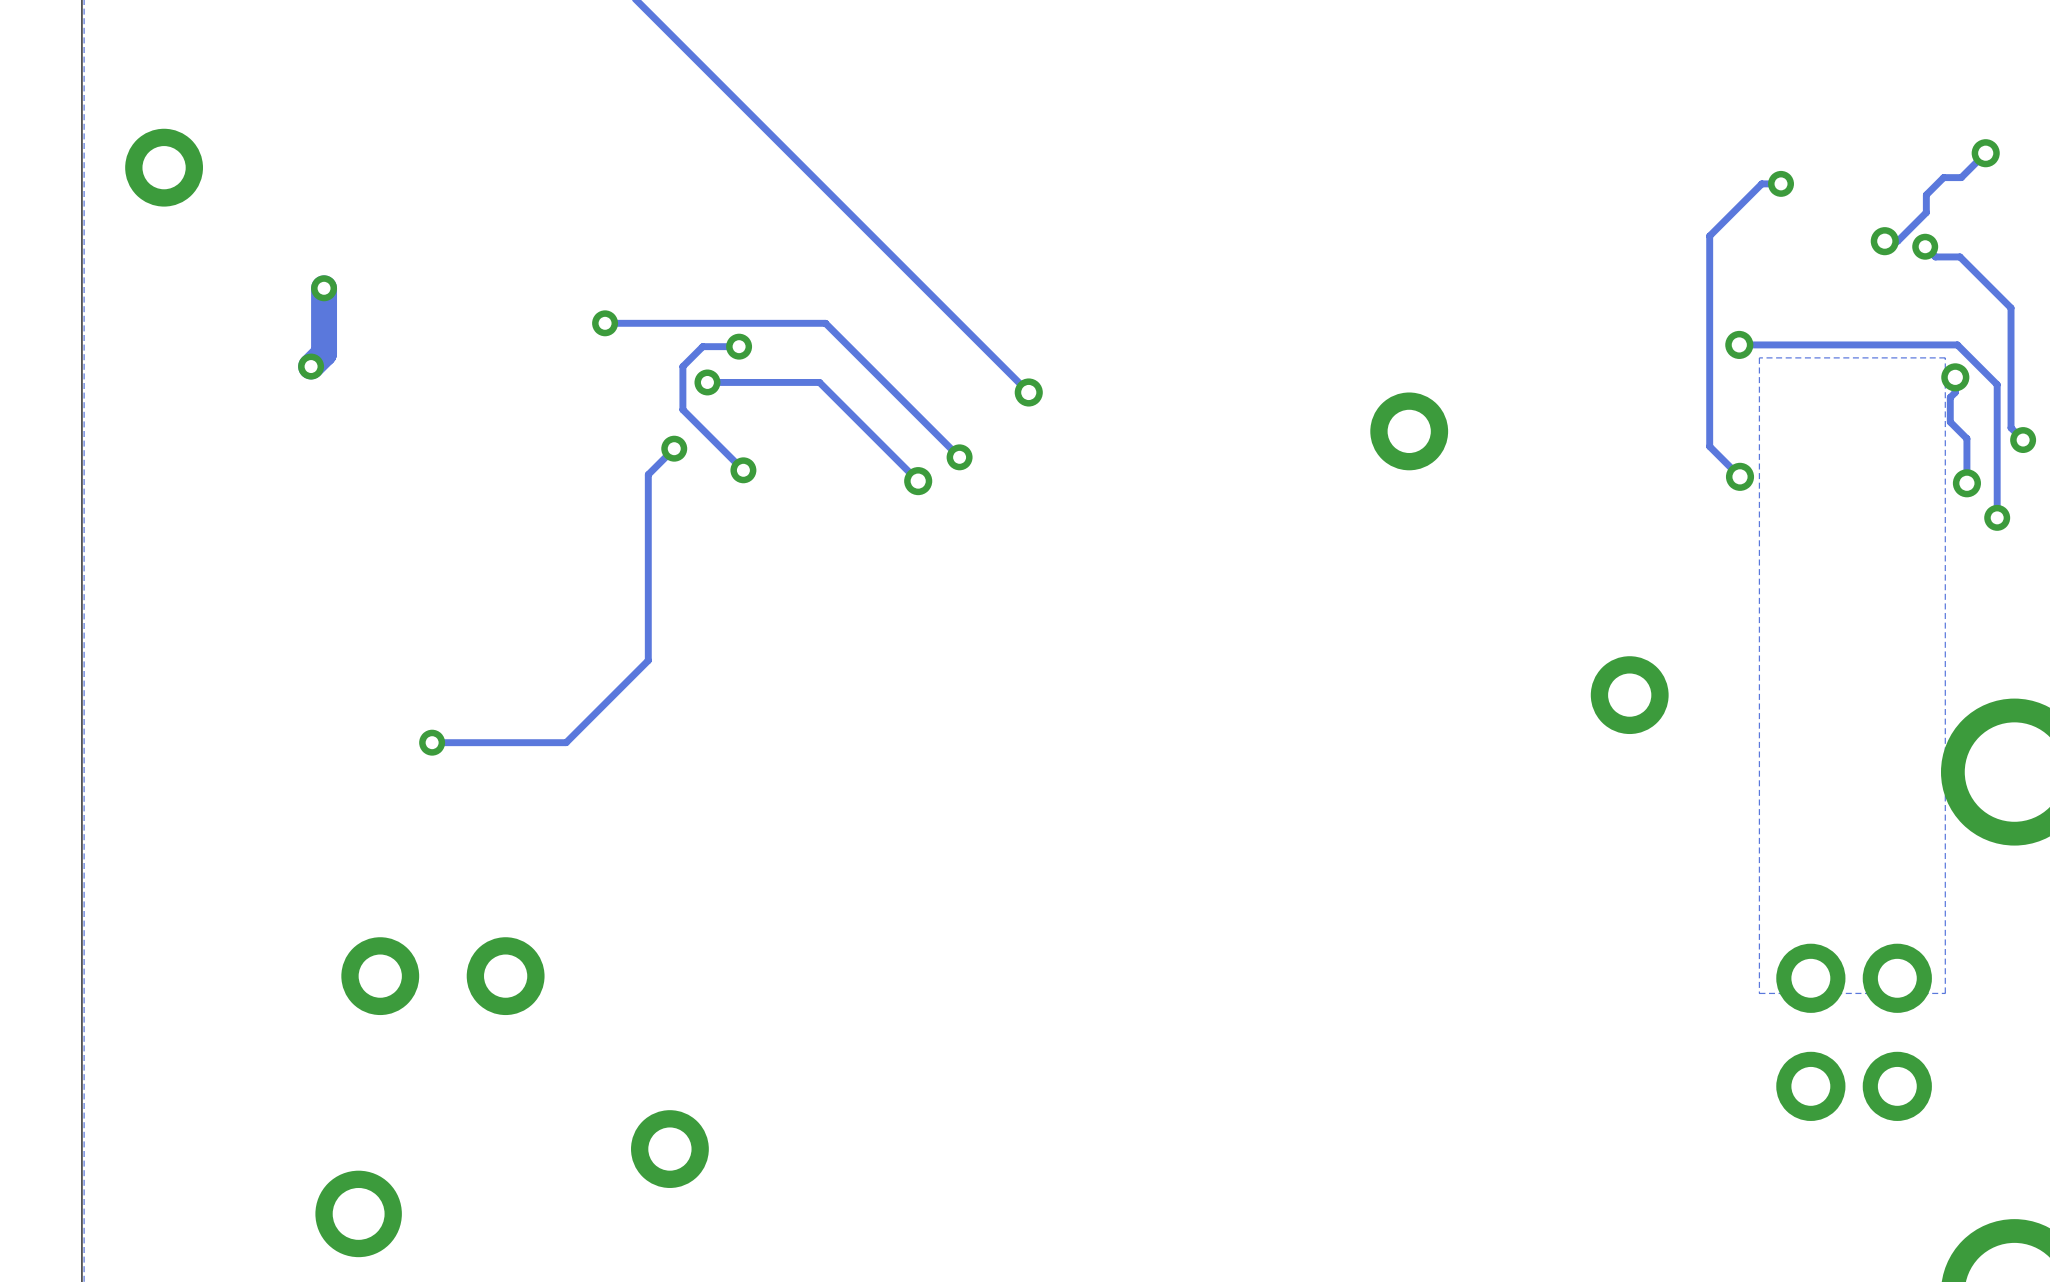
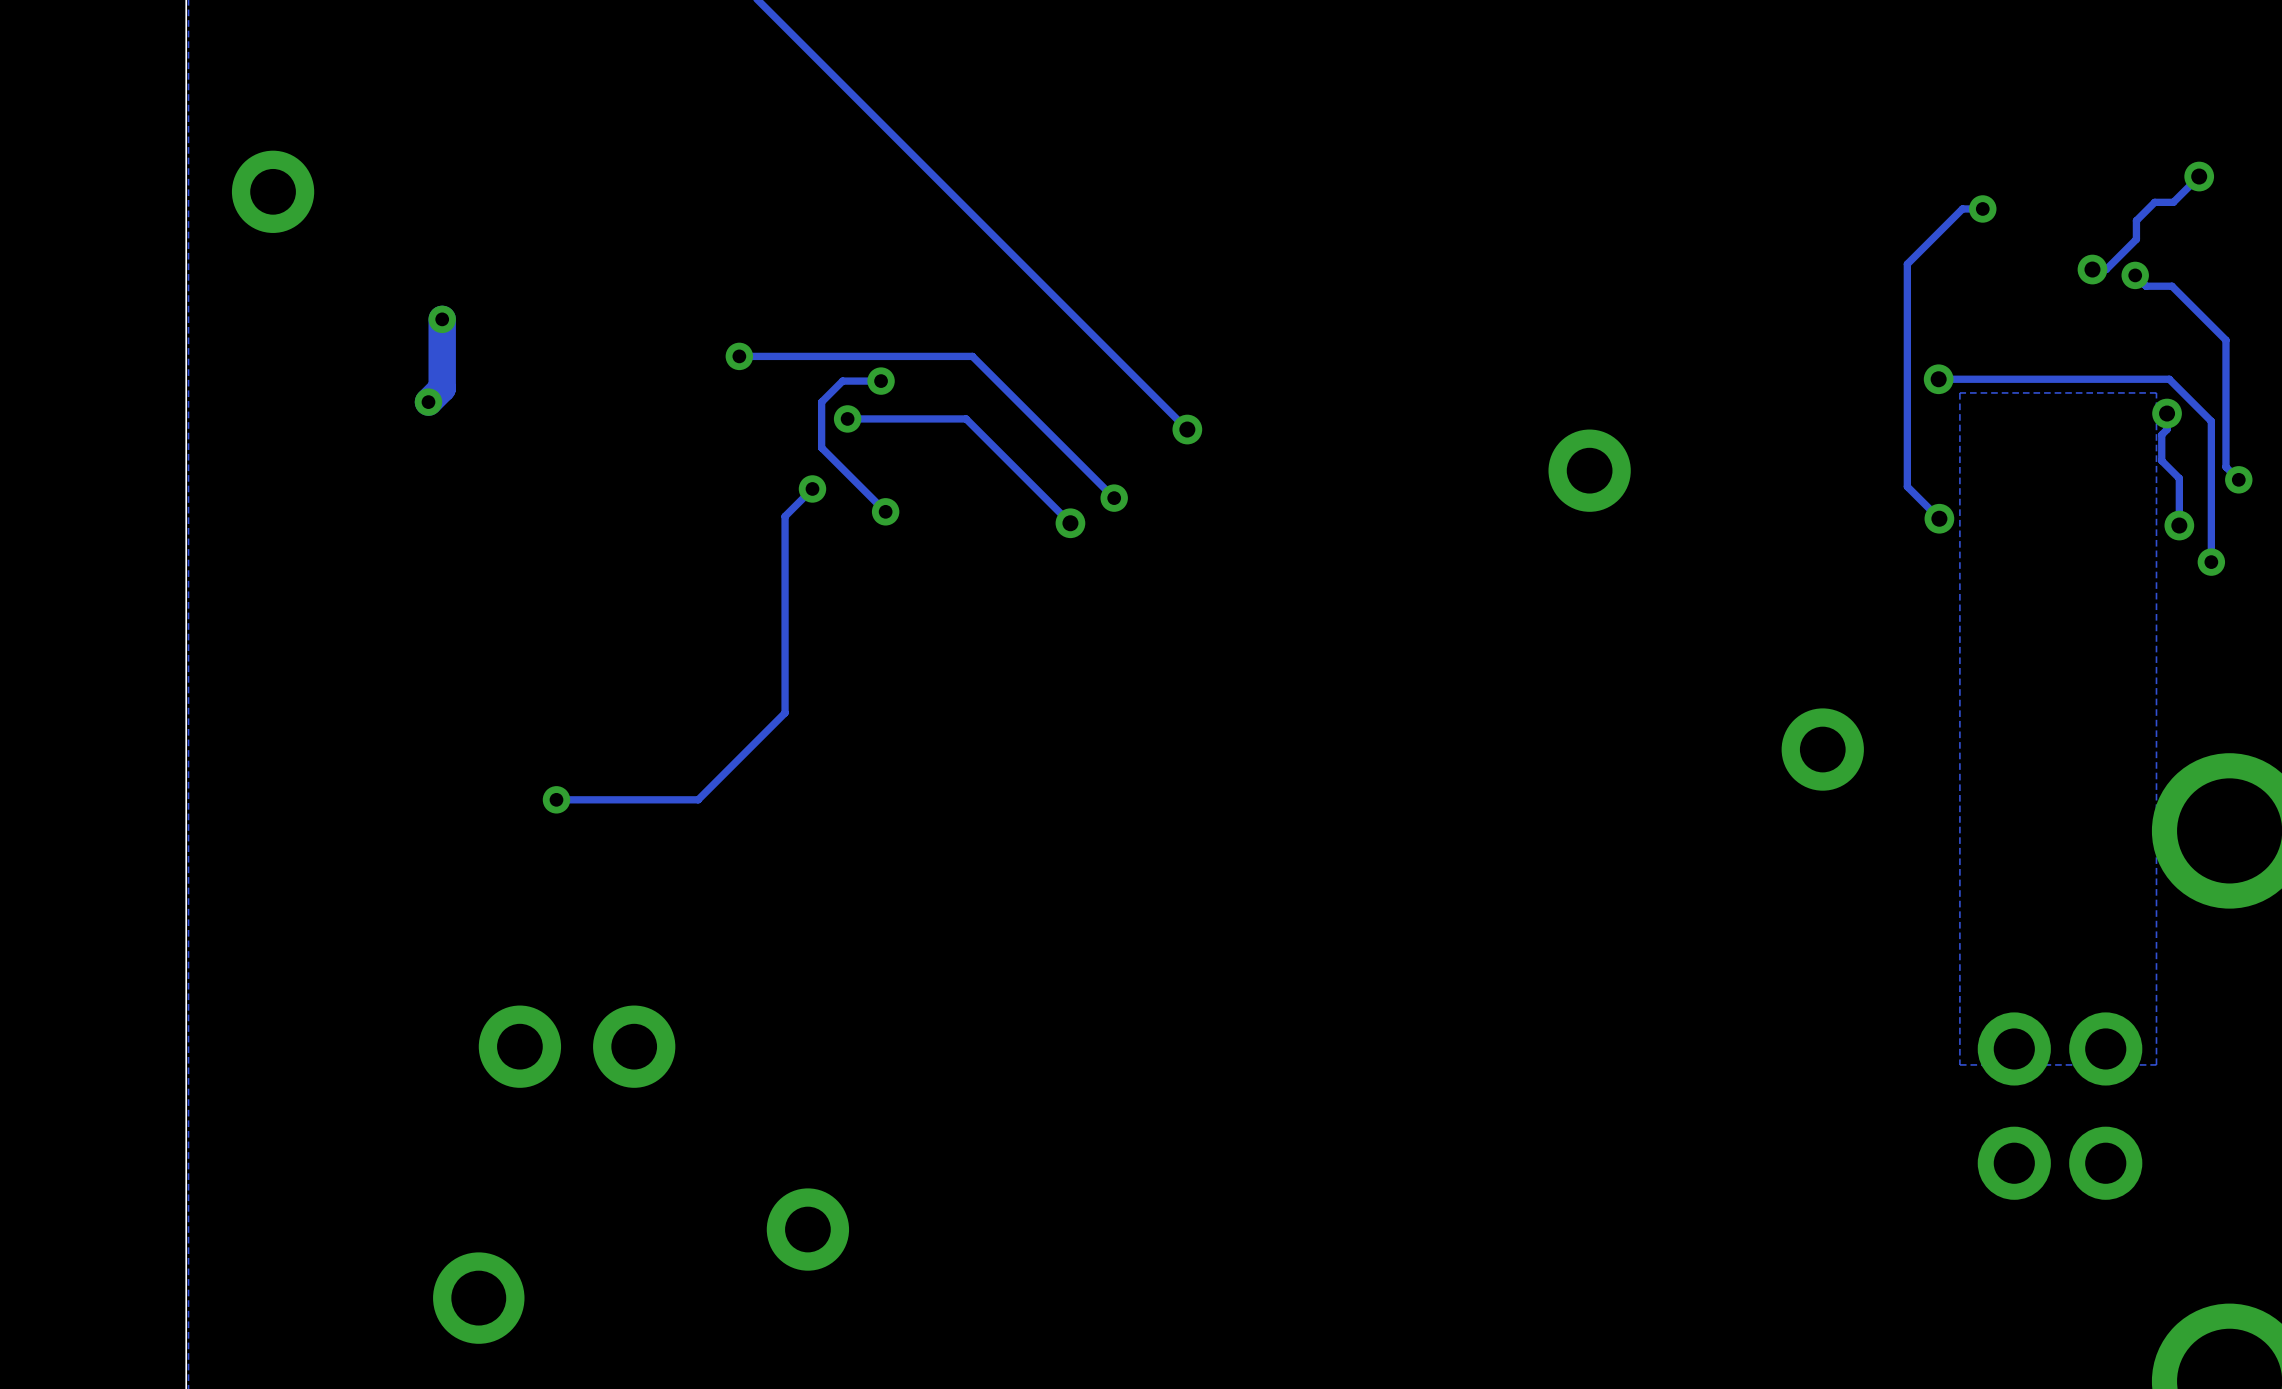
part position: (380, 976) -> (519, 1046)

